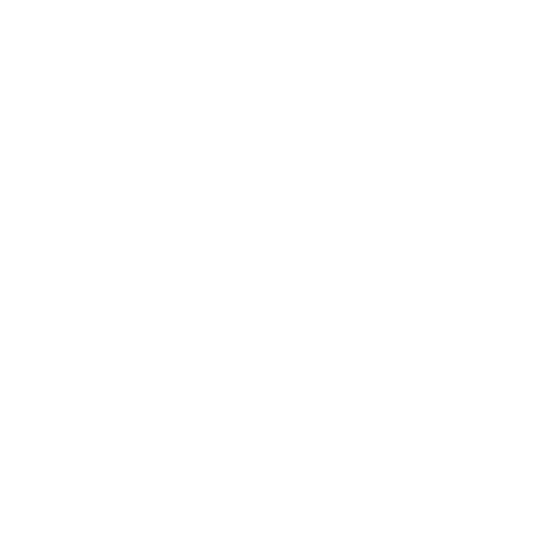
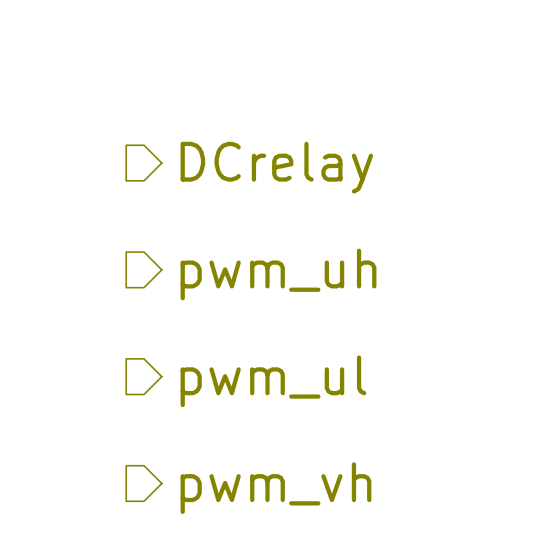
hierarchical label: none -> DCrelay (276, 167)
hierarchical label: none -> pwm_uh (278, 274)
hierarchical label: none -> pwm_ul (273, 381)
hierarchical label: none -> pwm_vh (275, 488)

